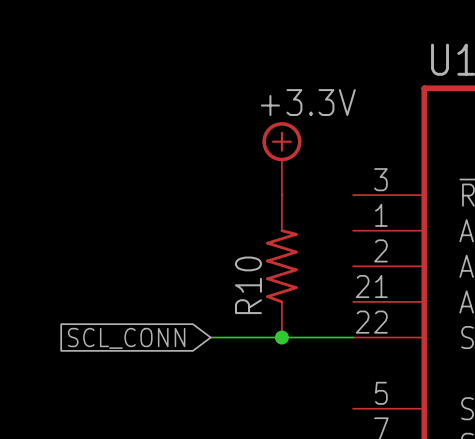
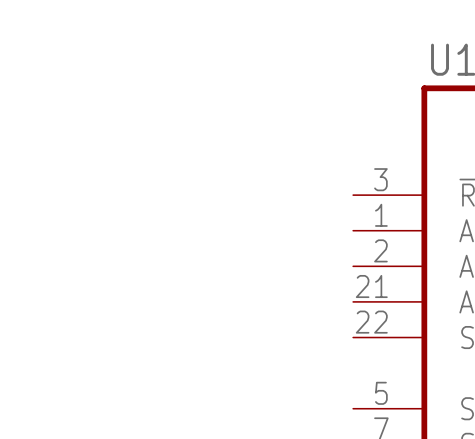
power symbol: +3.3V (281, 158) -> none
R10: (281, 266) -> none
wire: (210, 337) (353, 337) -> none
junction: (281, 337) -> none
global label: SCL_CONN (126, 338) -> none

